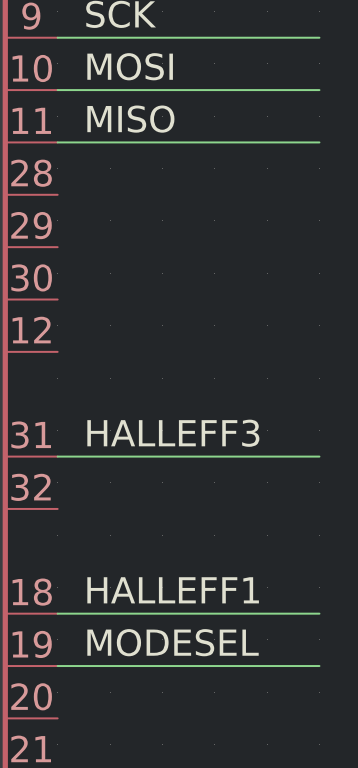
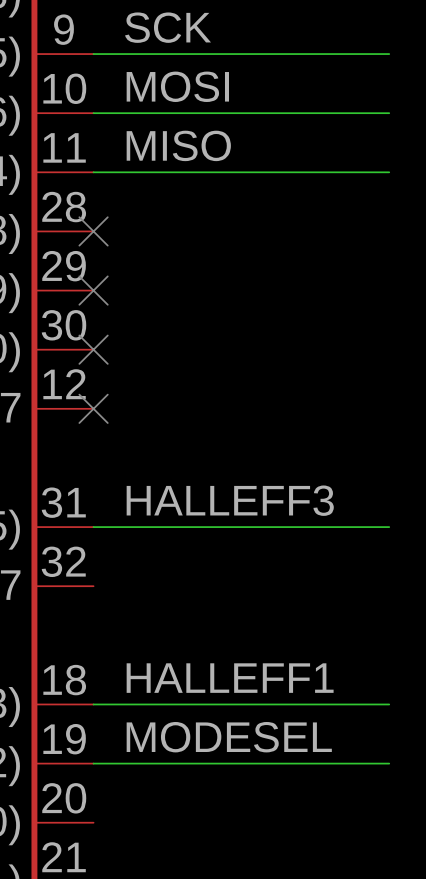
no-connect mark: none -> (93, 231)
no-connect mark: none -> (93, 290)
no-connect mark: none -> (93, 349)
no-connect mark: none -> (93, 408)

